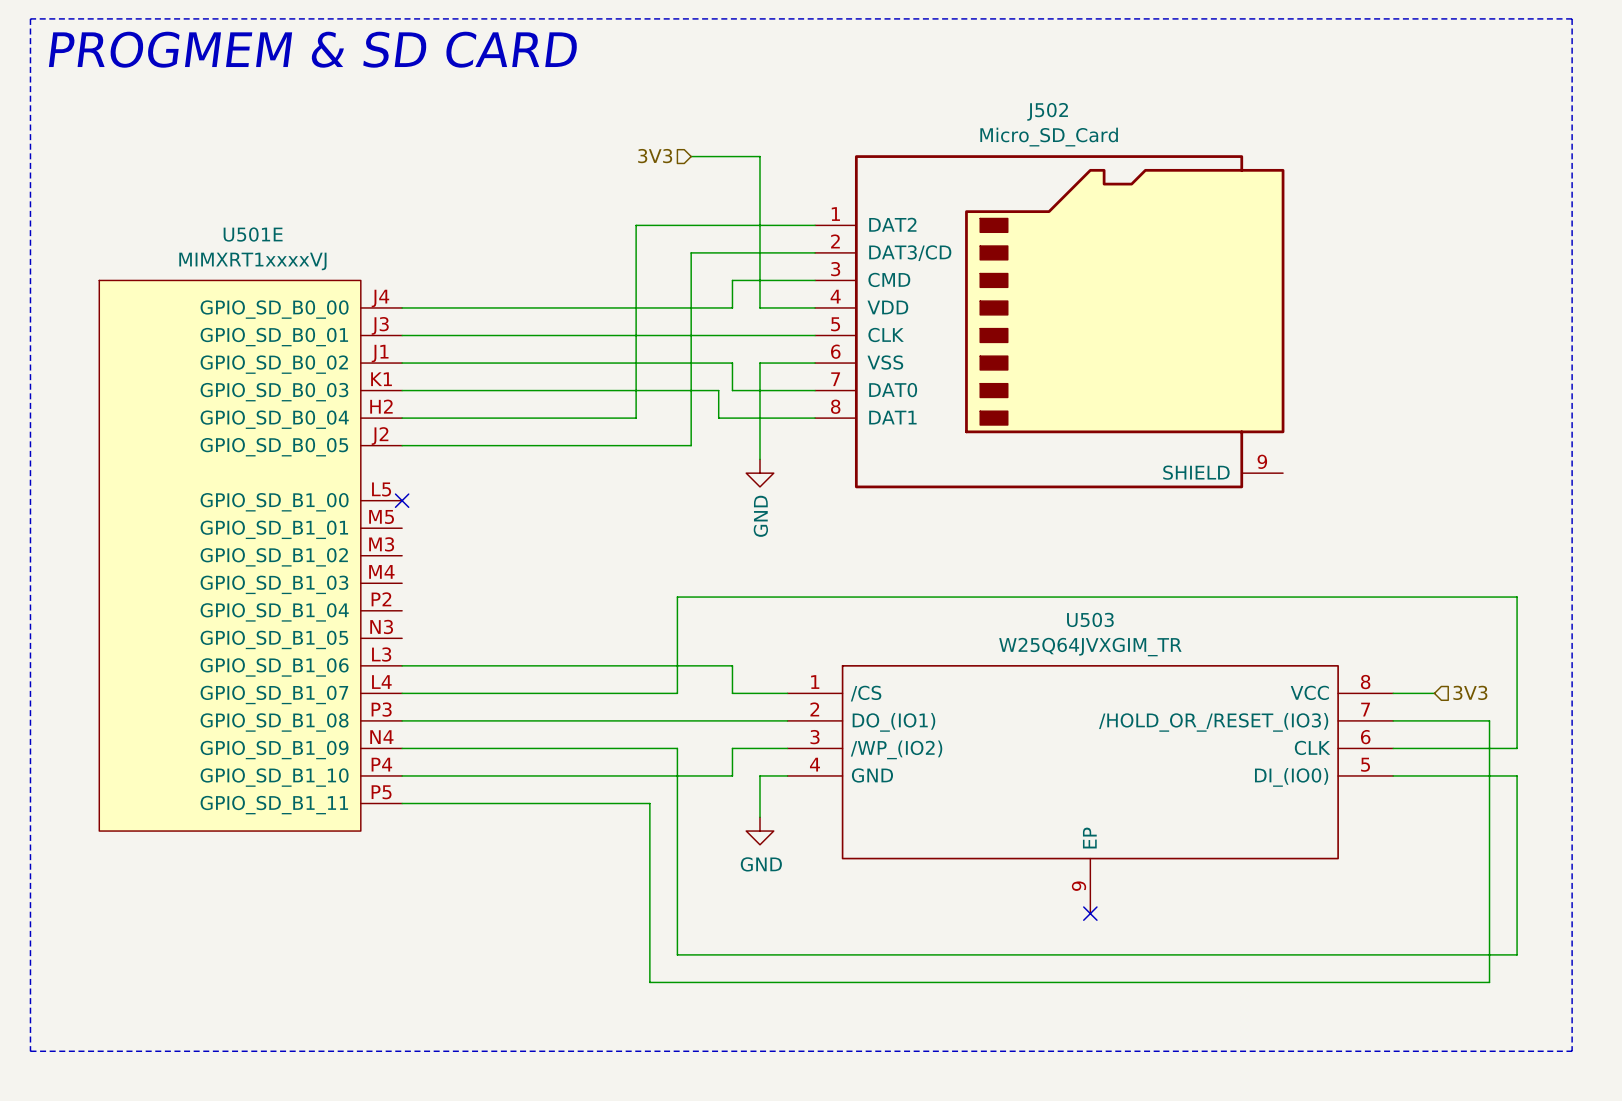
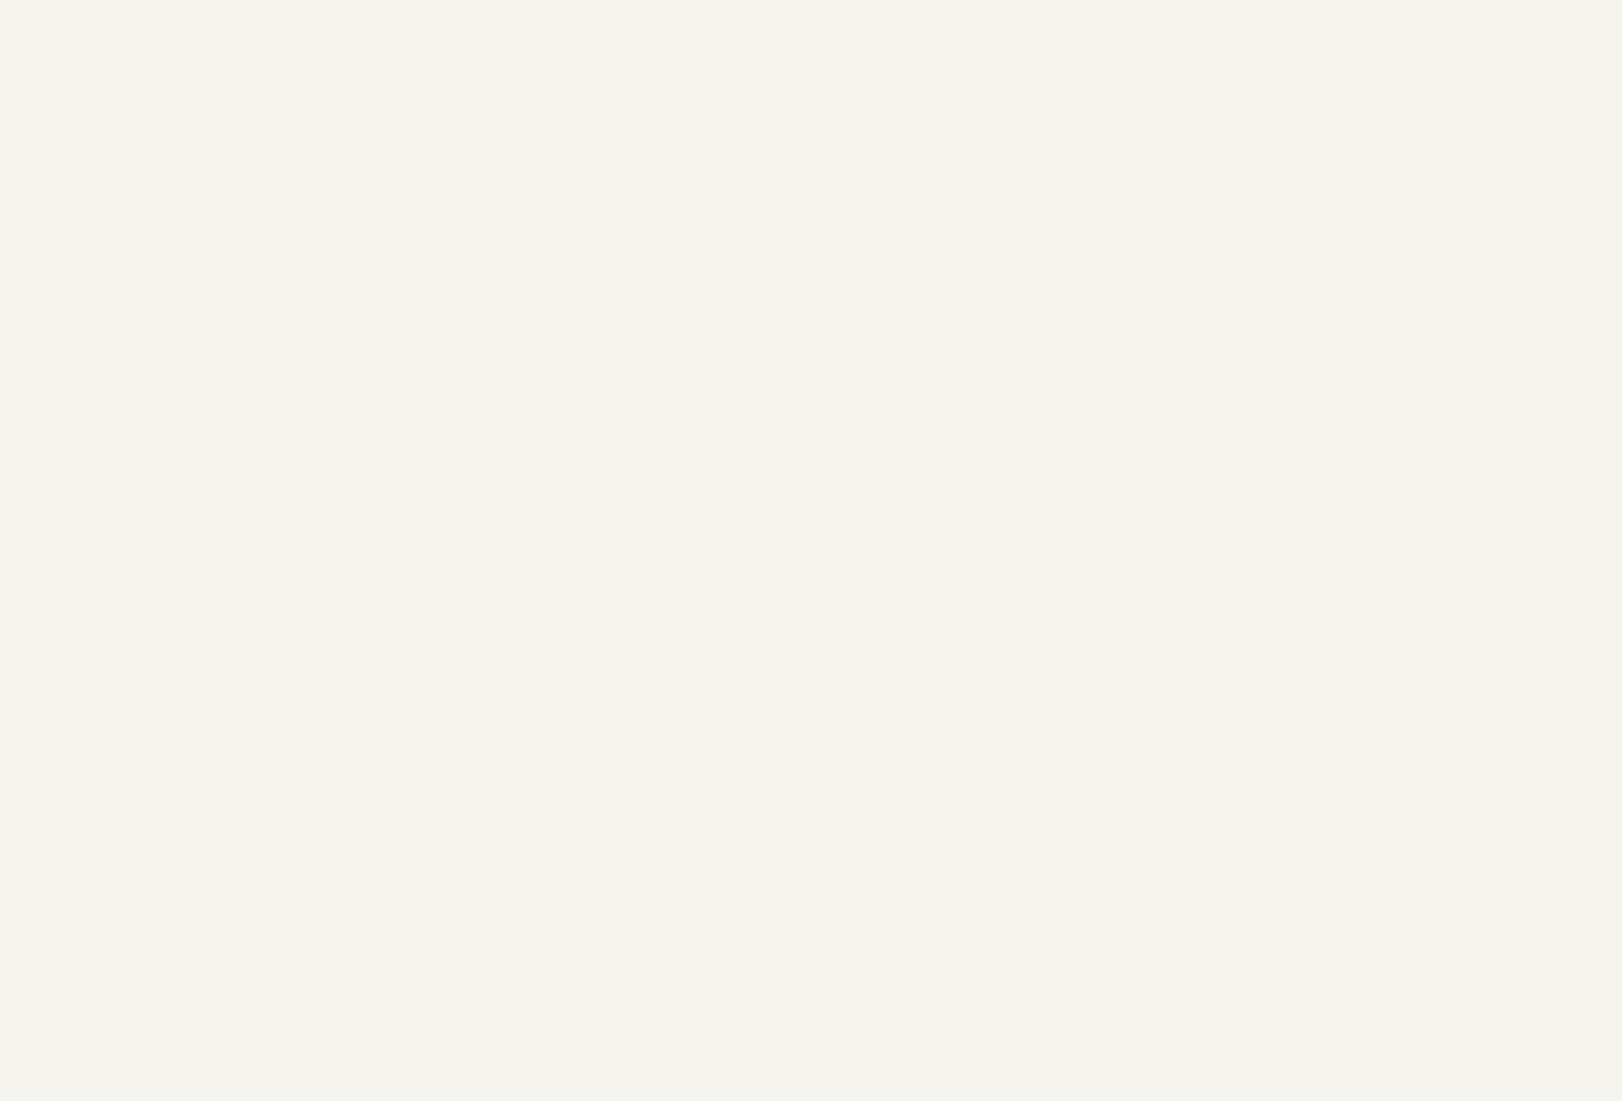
line: (30, 18) (1572, 18) (1572, 1051) (30, 1051) (30, 18) -> none
text: PROGMEM & SD CARD (313, 49) -> none
hierarchical label: 3V3 (655, 156) -> none
wire: (691, 156) (759, 156) (759, 307) (815, 307) -> none
wire: (815, 225) (636, 225) (636, 418) (402, 418) -> none
wire: (815, 252) (691, 252) (691, 445) (402, 445) -> none
wire: (815, 280) (732, 280) (732, 307) (402, 307) -> none
J502: Micro_SD_Card (1049, 321) -> none
wire: (402, 335) (815, 335) -> none
wire: (402, 363) (732, 363) (732, 390) (815, 390) -> none
wire: (815, 363) (759, 363) (759, 459) -> none
wire: (402, 390) (718, 390) (718, 418) (815, 418) -> none
power symbol: GND (759, 473) -> none
no-connect mark: (402, 500) -> none
U501E: MIMXRT1xxxxVJ (250, 555) -> none
wire: (402, 665) (732, 665) (732, 693) (787, 693) -> none
hierarchical label: 3V3 (1470, 692) -> none
wire: (402, 693) (677, 693) (677, 597) (1517, 597) (1517, 748) (1393, 748) -> none
wire: (1393, 693) (1434, 693) -> none
wire: (402, 720) (787, 720) -> none
wire: (1393, 720) (1489, 720) (1489, 982) (649, 982) (649, 803) (402, 803) -> none
wire: (402, 748) (677, 748) (677, 954) (1517, 954) (1517, 775) (1393, 775) -> none
wire: (787, 748) (732, 748) (732, 775) (402, 775) -> none
wire: (787, 775) (759, 775) (759, 817) -> none
U503: W25Q64JVXGIM_TR (1090, 789) -> none
power symbol: GND (759, 831) -> none
no-connect mark: (1090, 913) -> none

